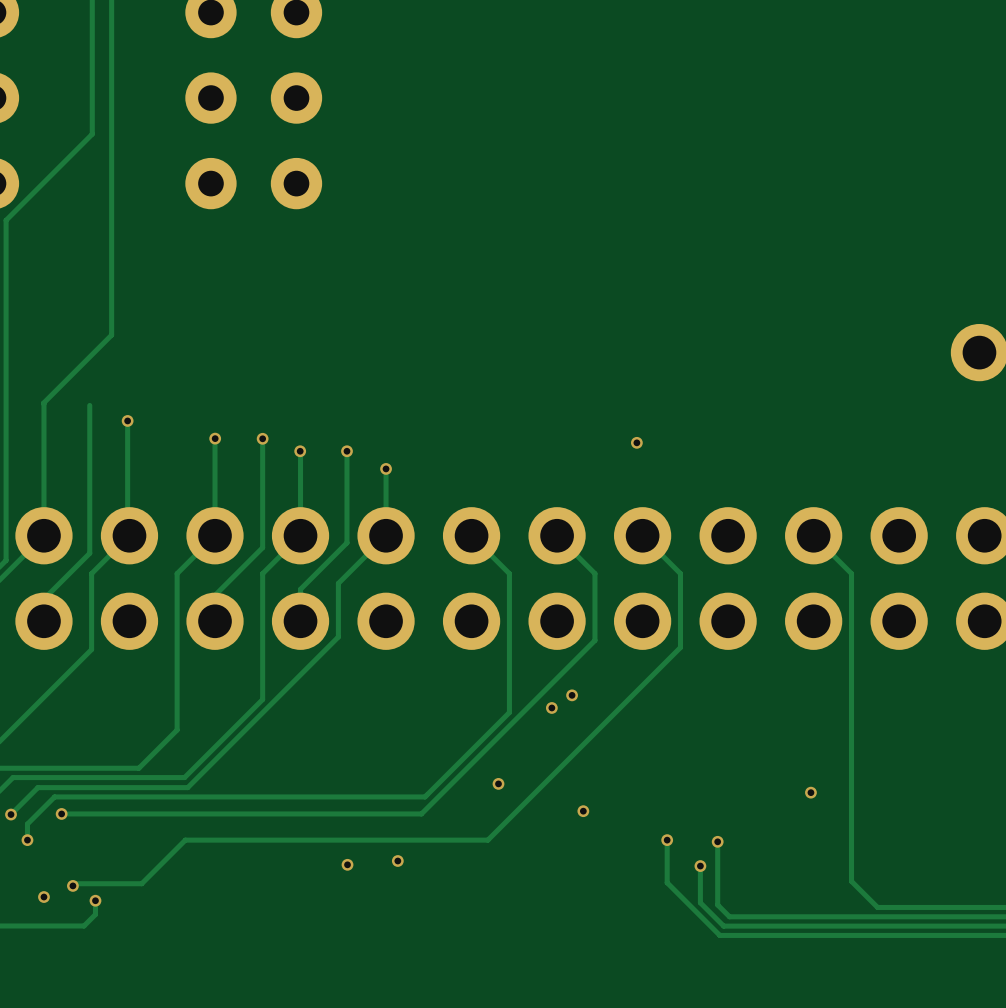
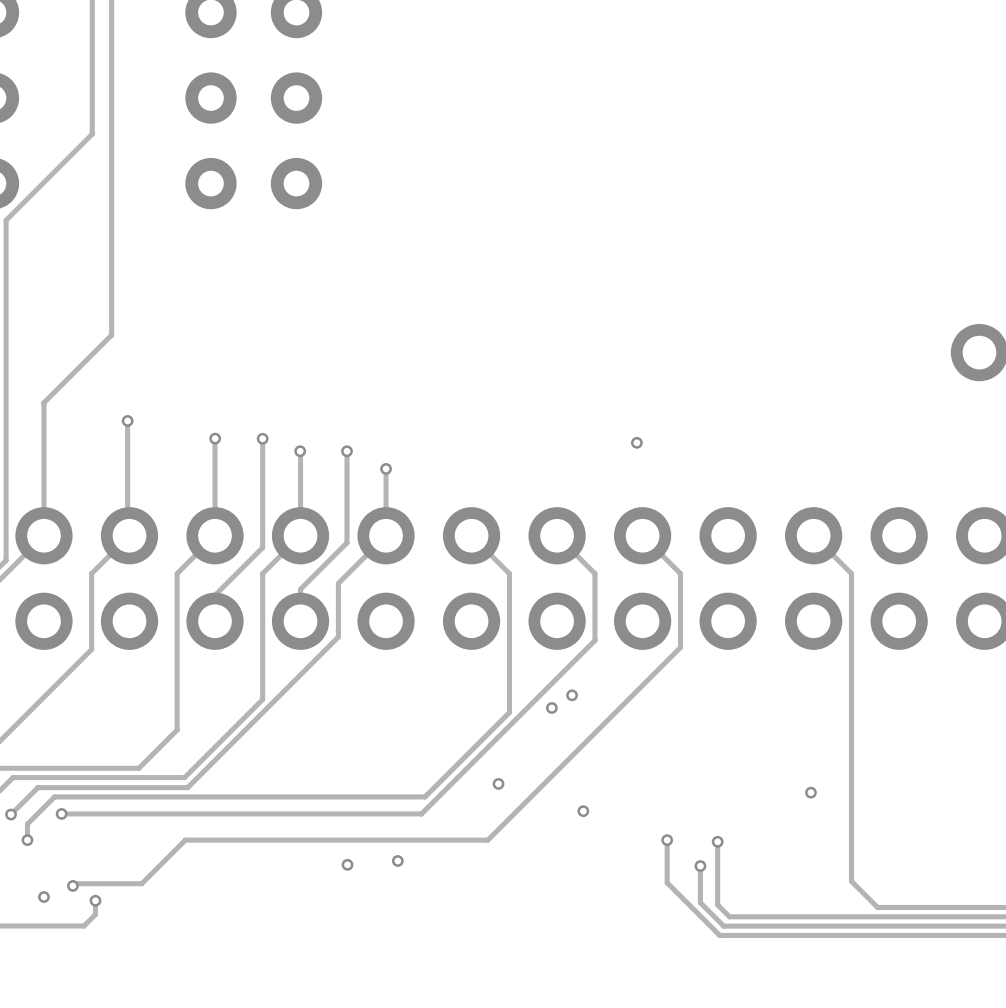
track: (89, 405) (89, 553) (43, 599) -> none

